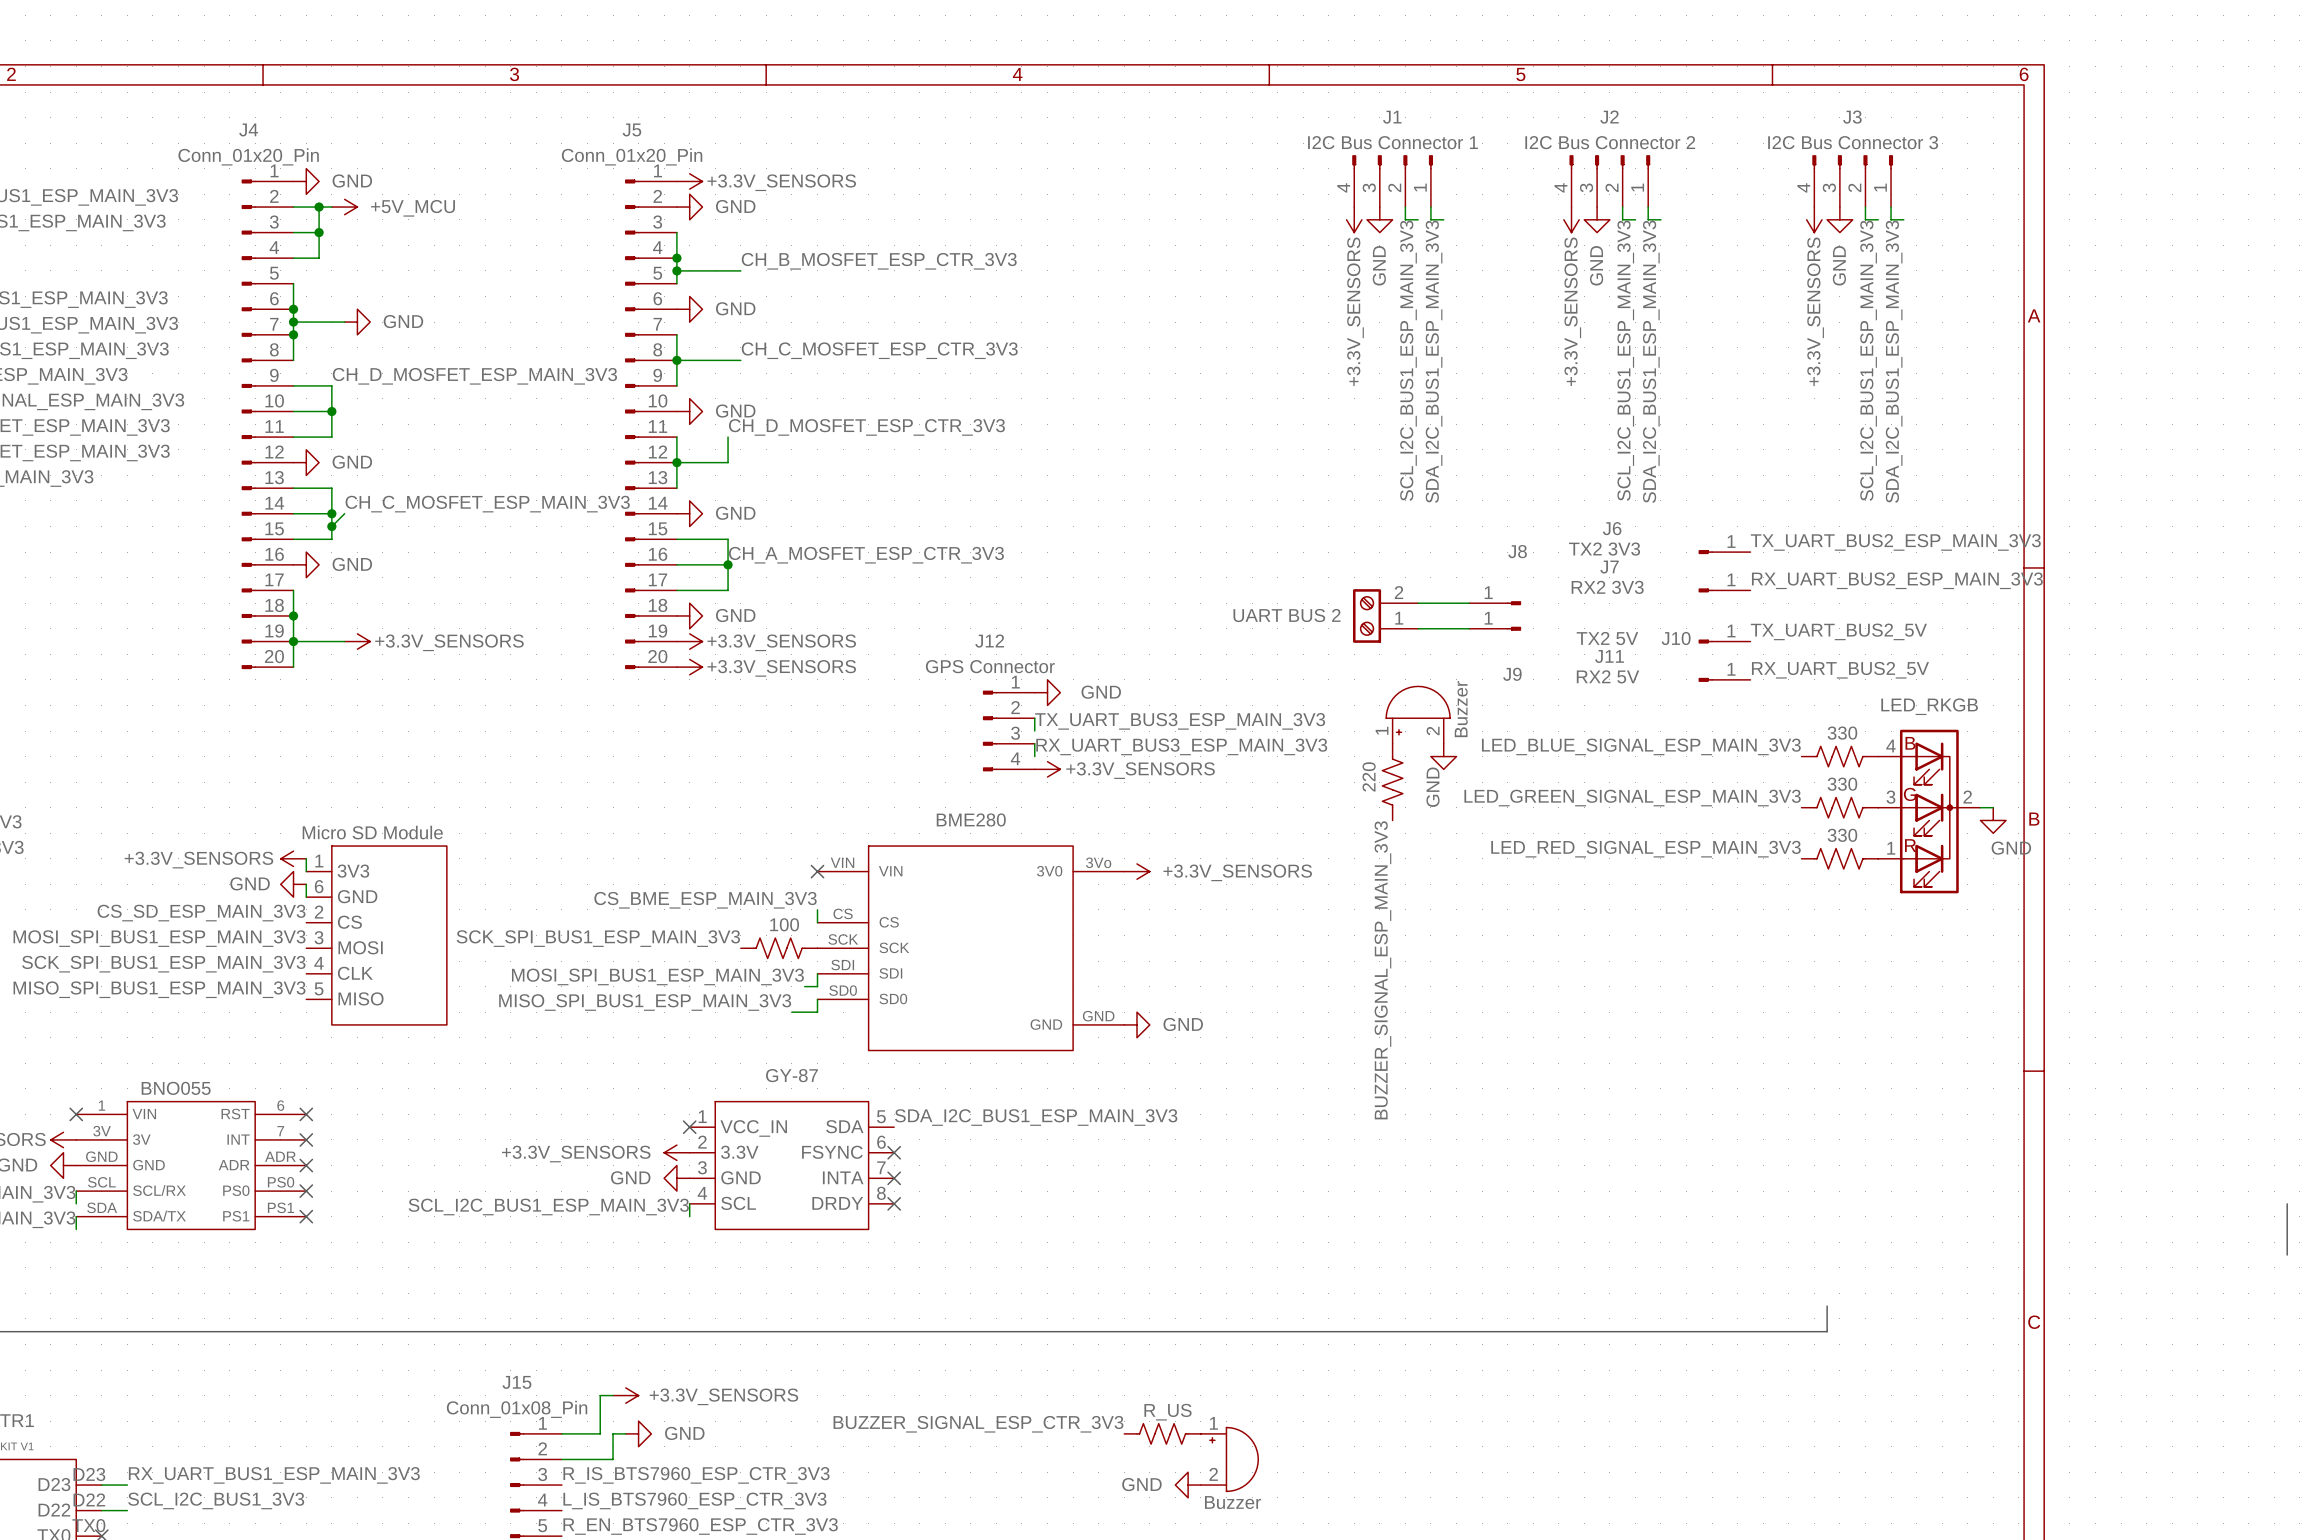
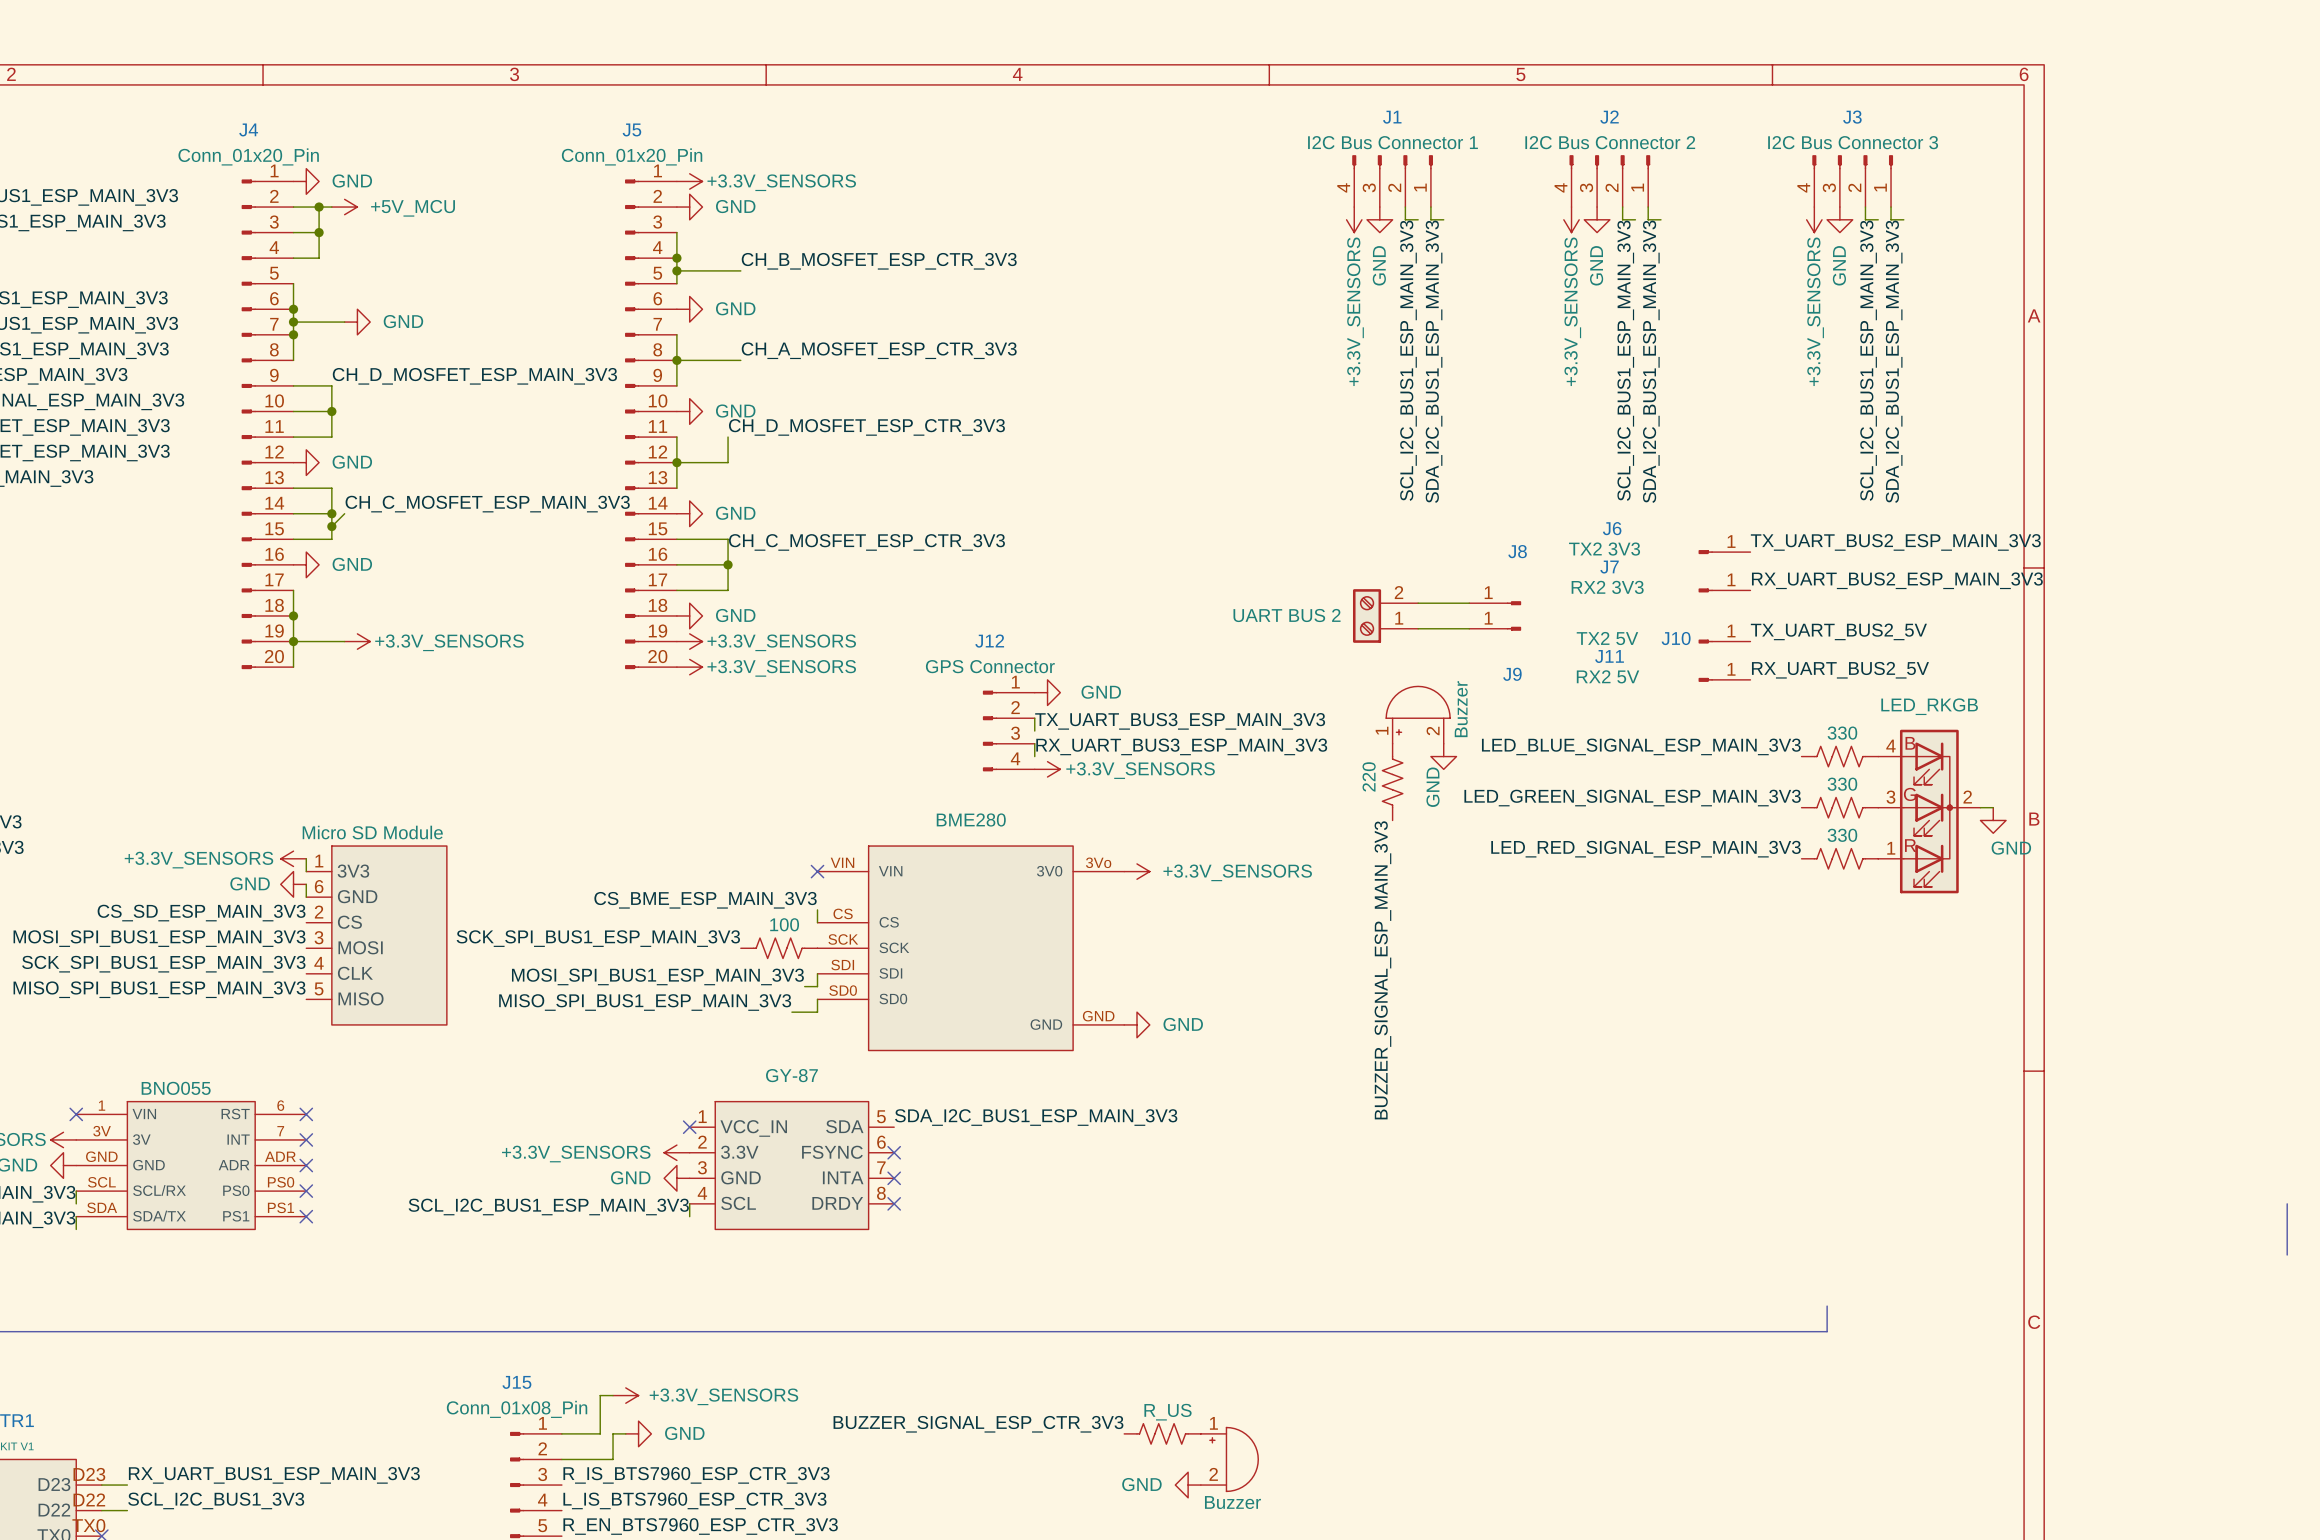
label: CH_C_MOSFET_ESP_CTR_3V3 (879, 350) -> CH_A_MOSFET_ESP_CTR_3V3 (879, 350)
label: CH_A_MOSFET_ESP_CTR_3V3 (866, 555) -> CH_C_MOSFET_ESP_CTR_3V3 (866, 542)

